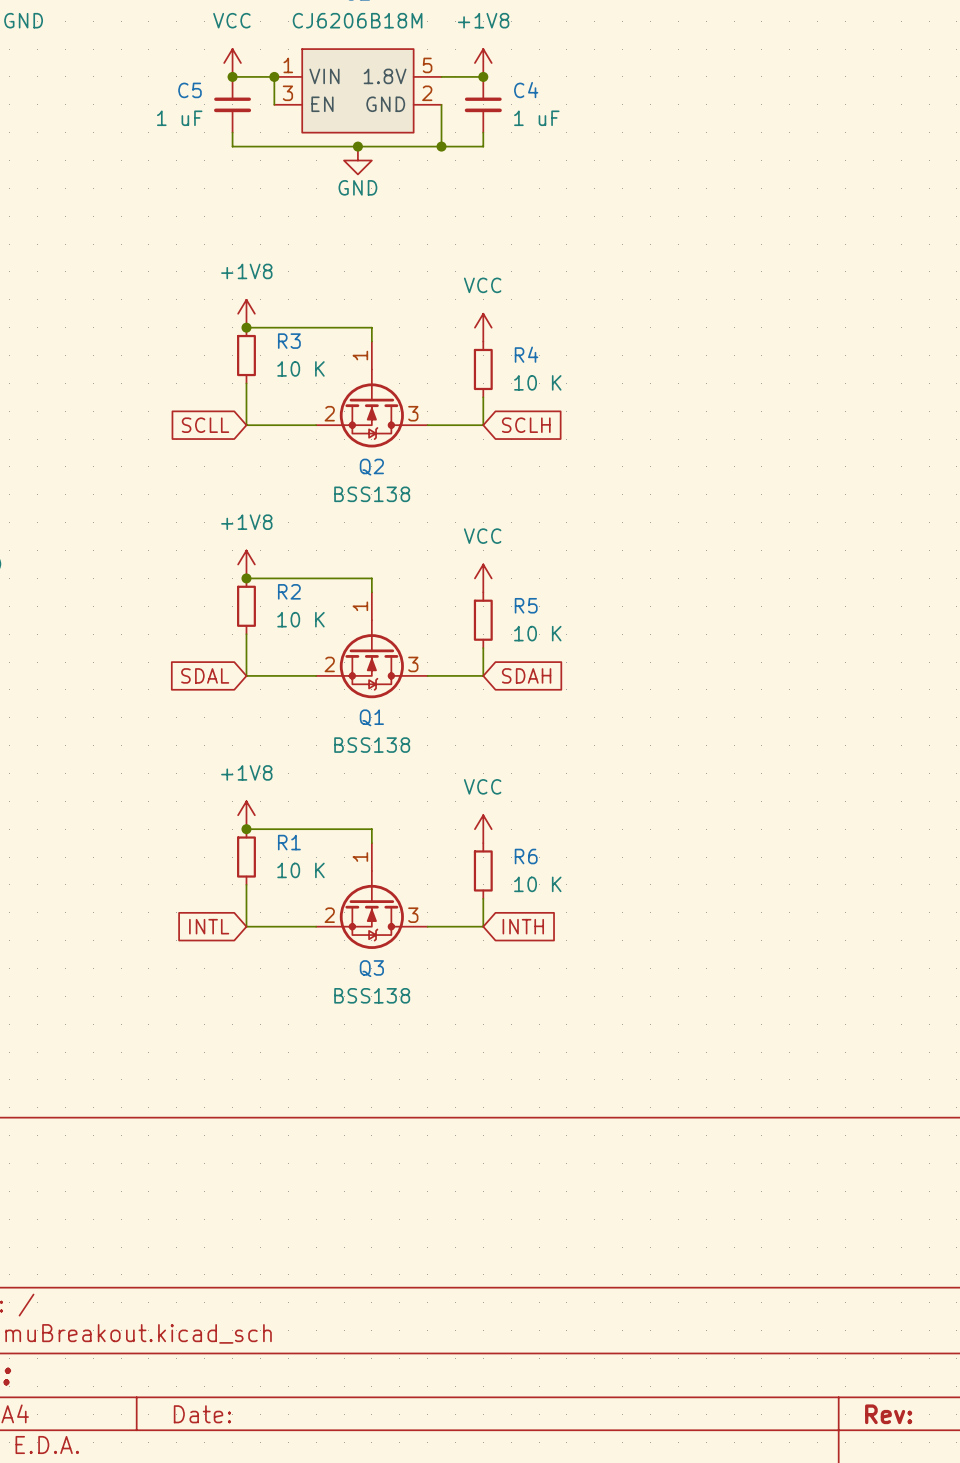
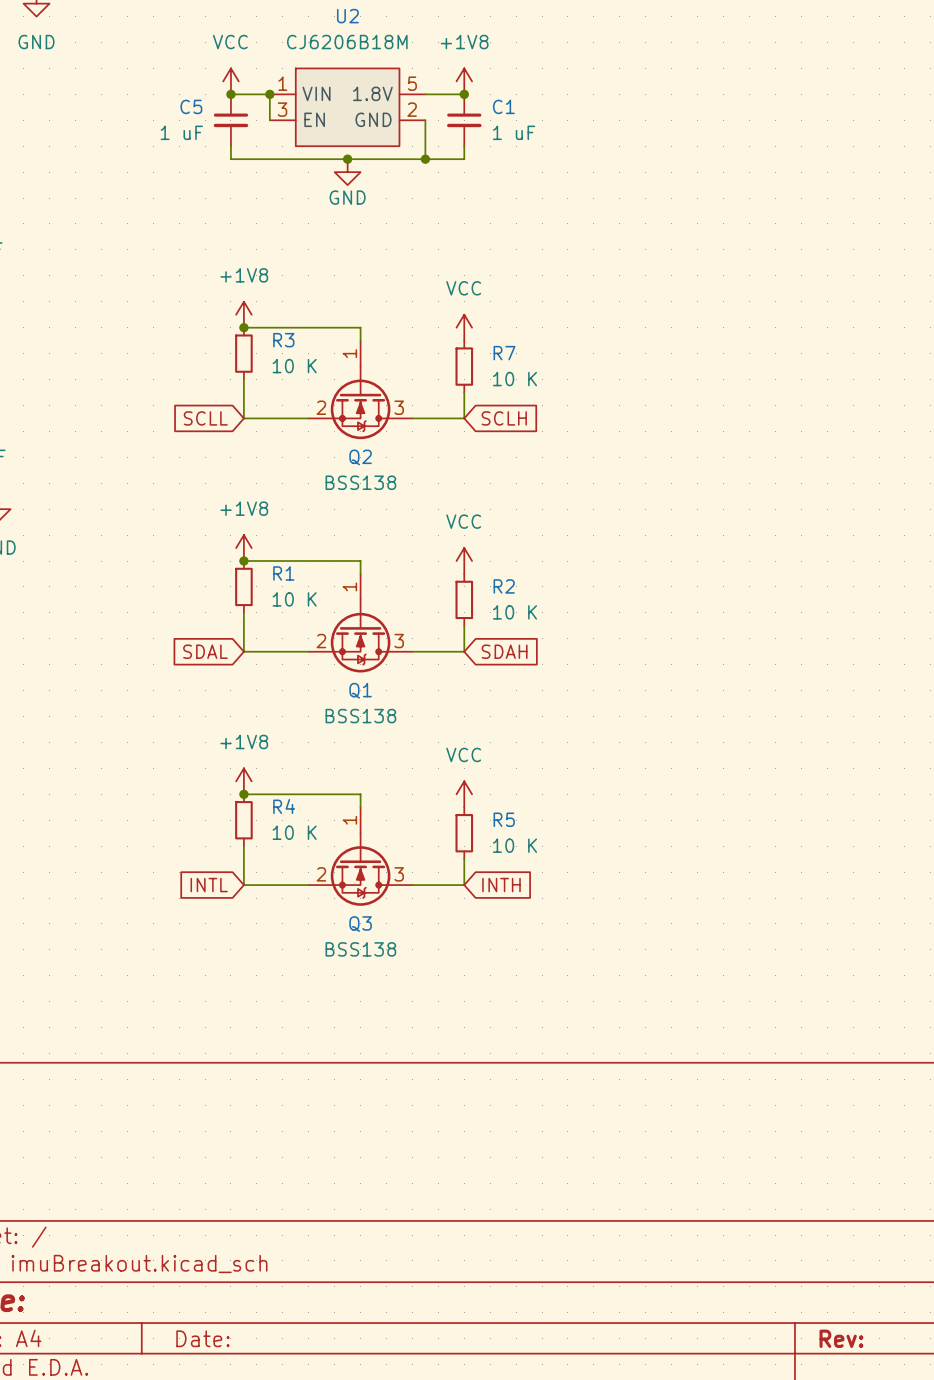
C4 name: C4 (526, 90) -> C1 (503, 106)
R4 name: R4 (526, 354) -> R7 (504, 353)
R2 name: R2 (289, 591) -> R1 (283, 573)
R5 name: R5 (526, 605) -> R2 (504, 586)
R1 name: R1 (289, 842) -> R4 (284, 806)
R6 name: R6 (526, 856) -> R5 (504, 819)

